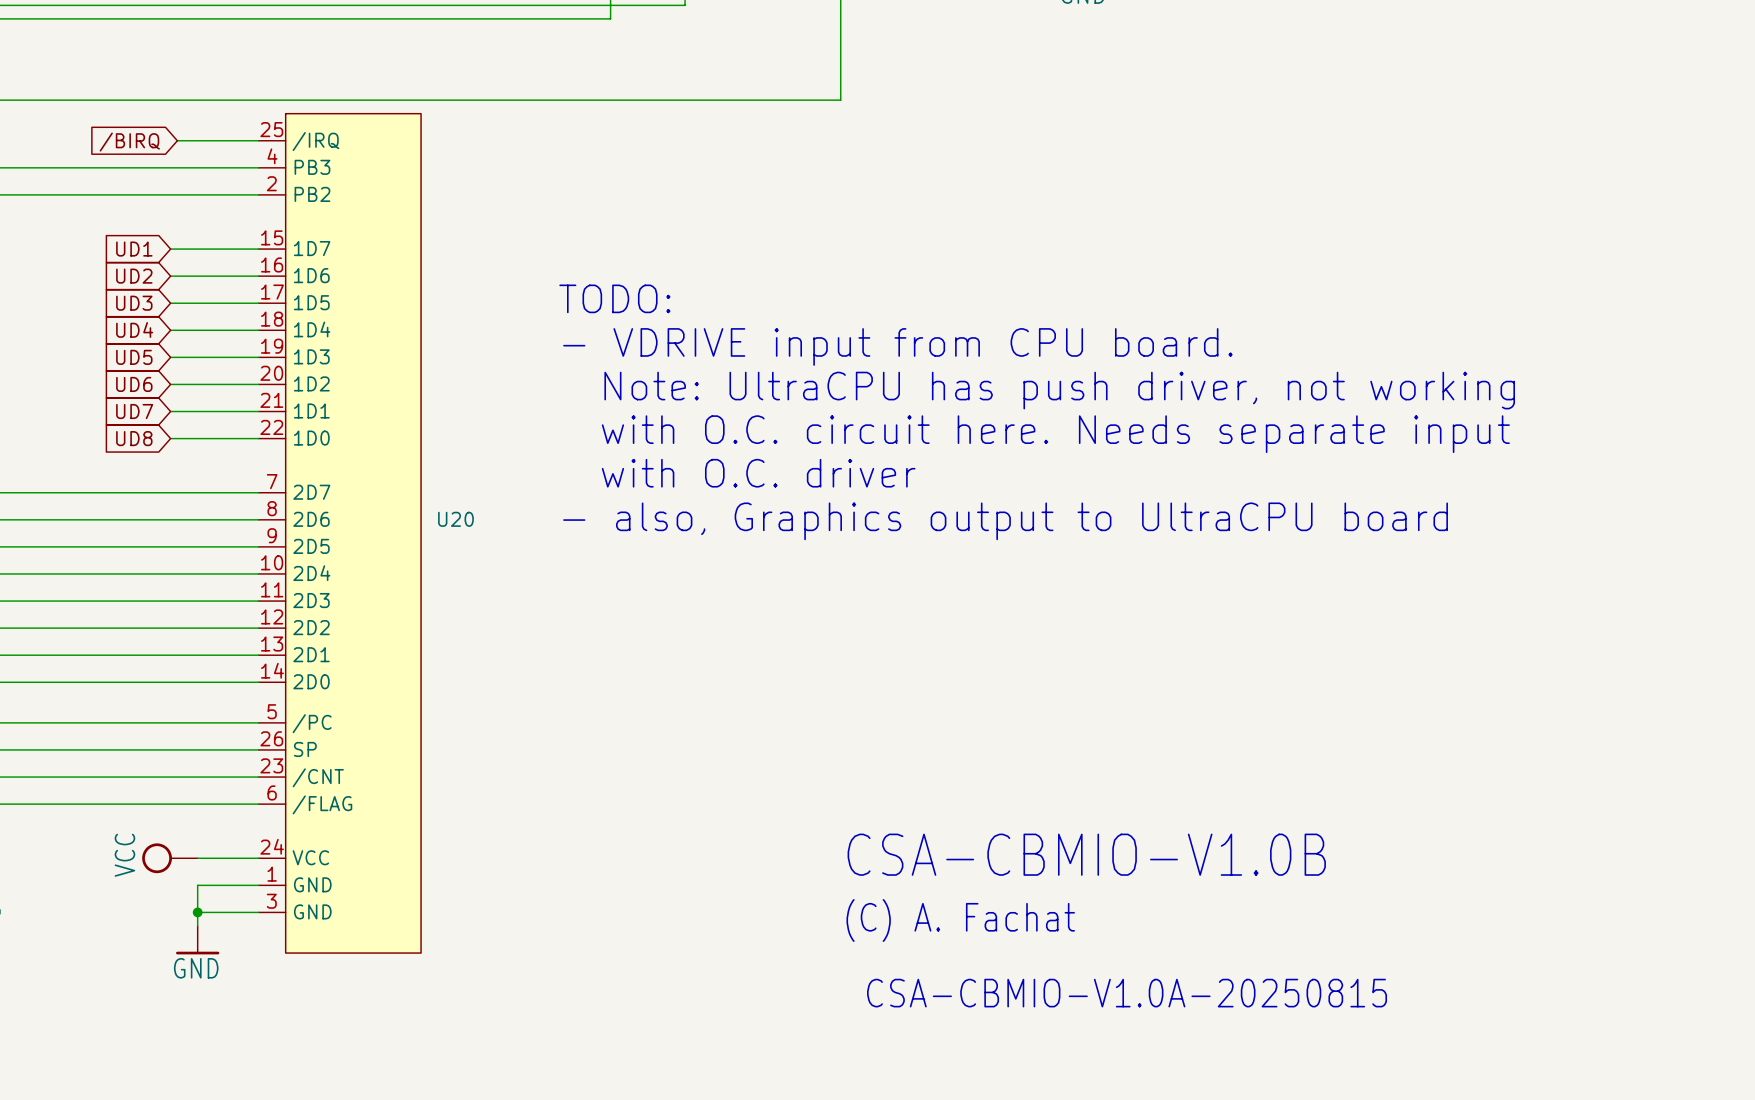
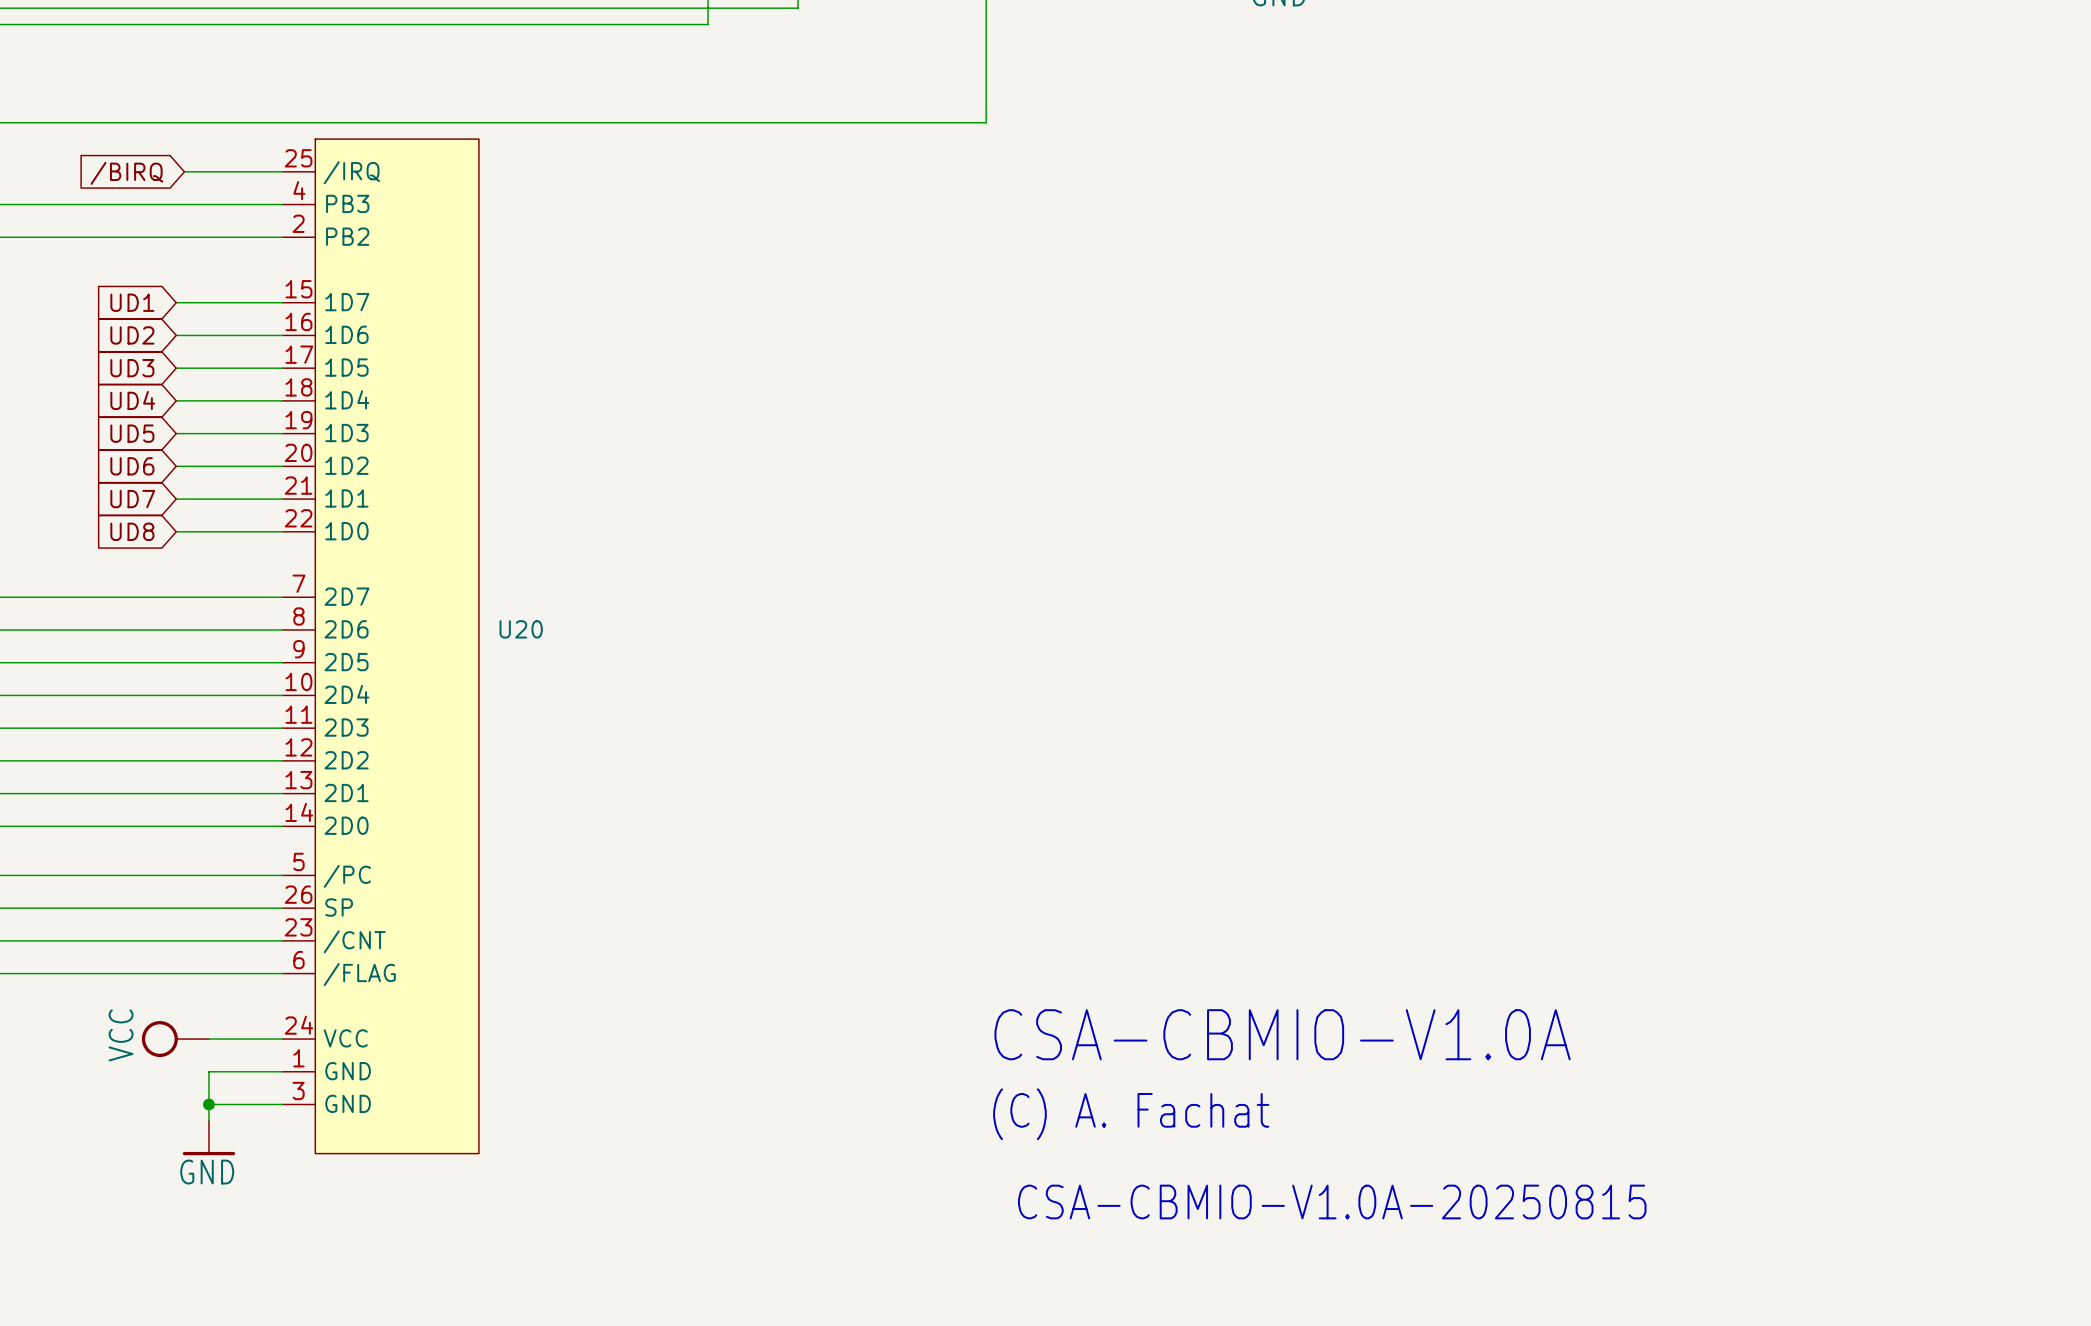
text: TODO: (614, 298) -> none
text: - VDRIVE input from CPU board. (897, 346) -> none
text: Note: UltraCPU has push driver, not working (1059, 390) -> none
text: with O.C. circuit here. Needs separate input (1055, 434) -> none
text: with O.C. driver (758, 473) -> none
text: - also, Graphics output to UltraCPU board (1005, 521) -> none
text: CSA-CBMIO-V1.0B (1086, 854) -> CSA-CBMIO-V1.0A (1282, 1034)

